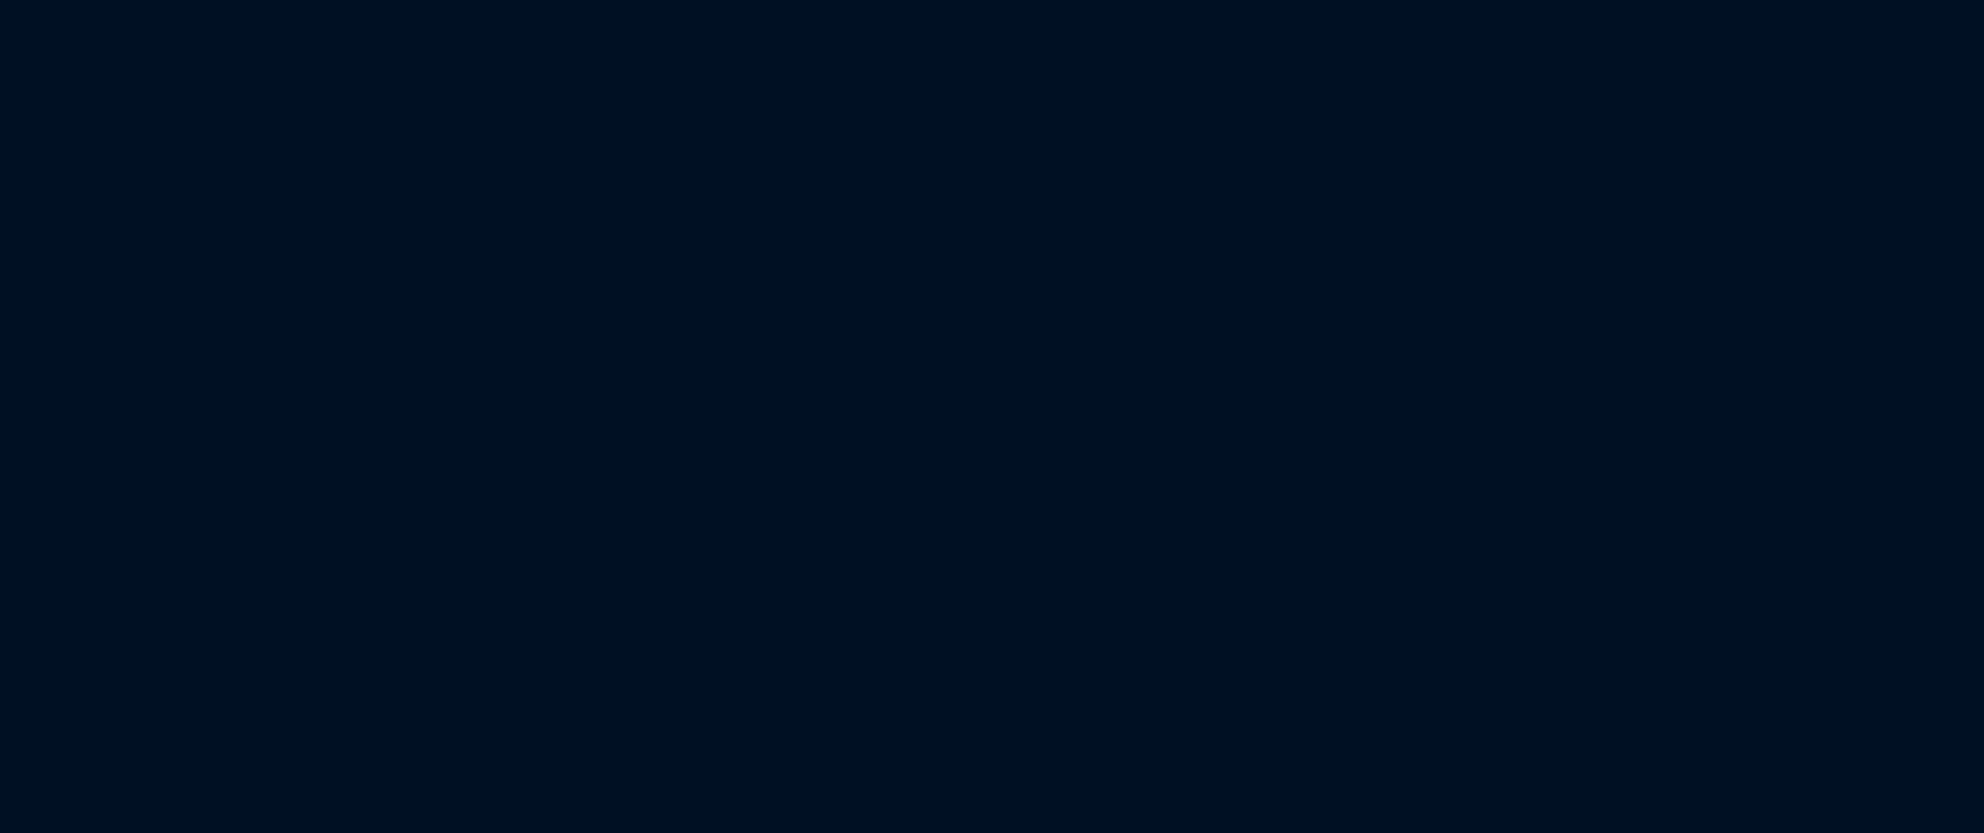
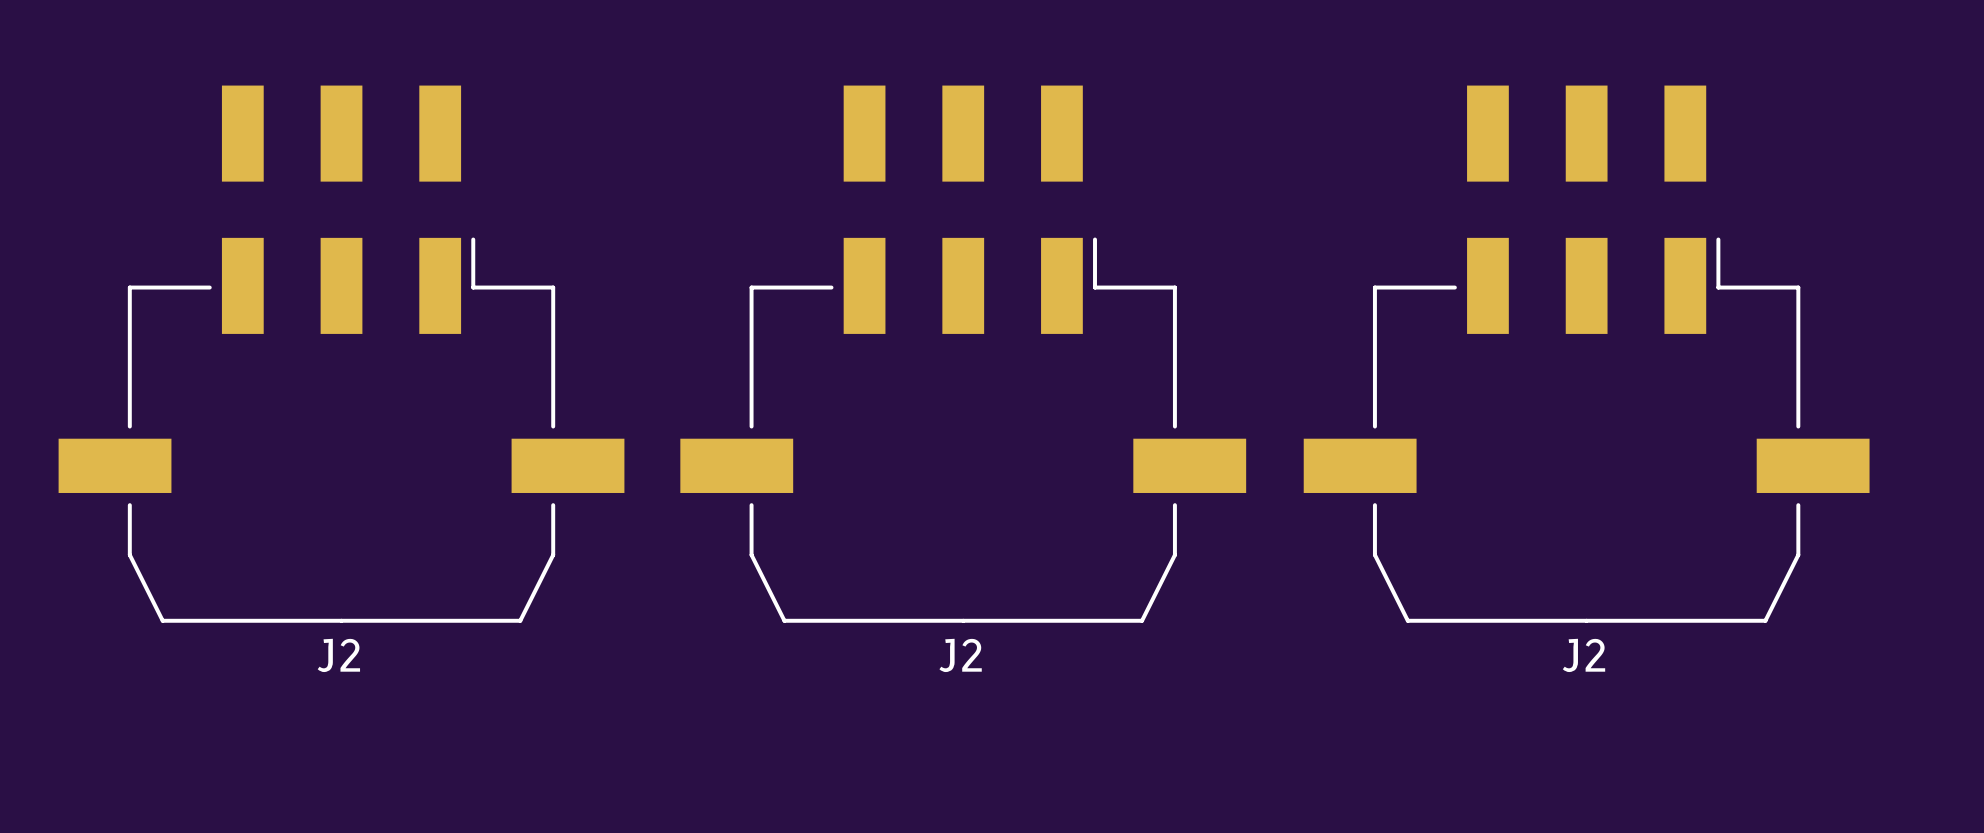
J2: none -> (341, 354)
J2: none -> (963, 354)
J2: none -> (1586, 354)

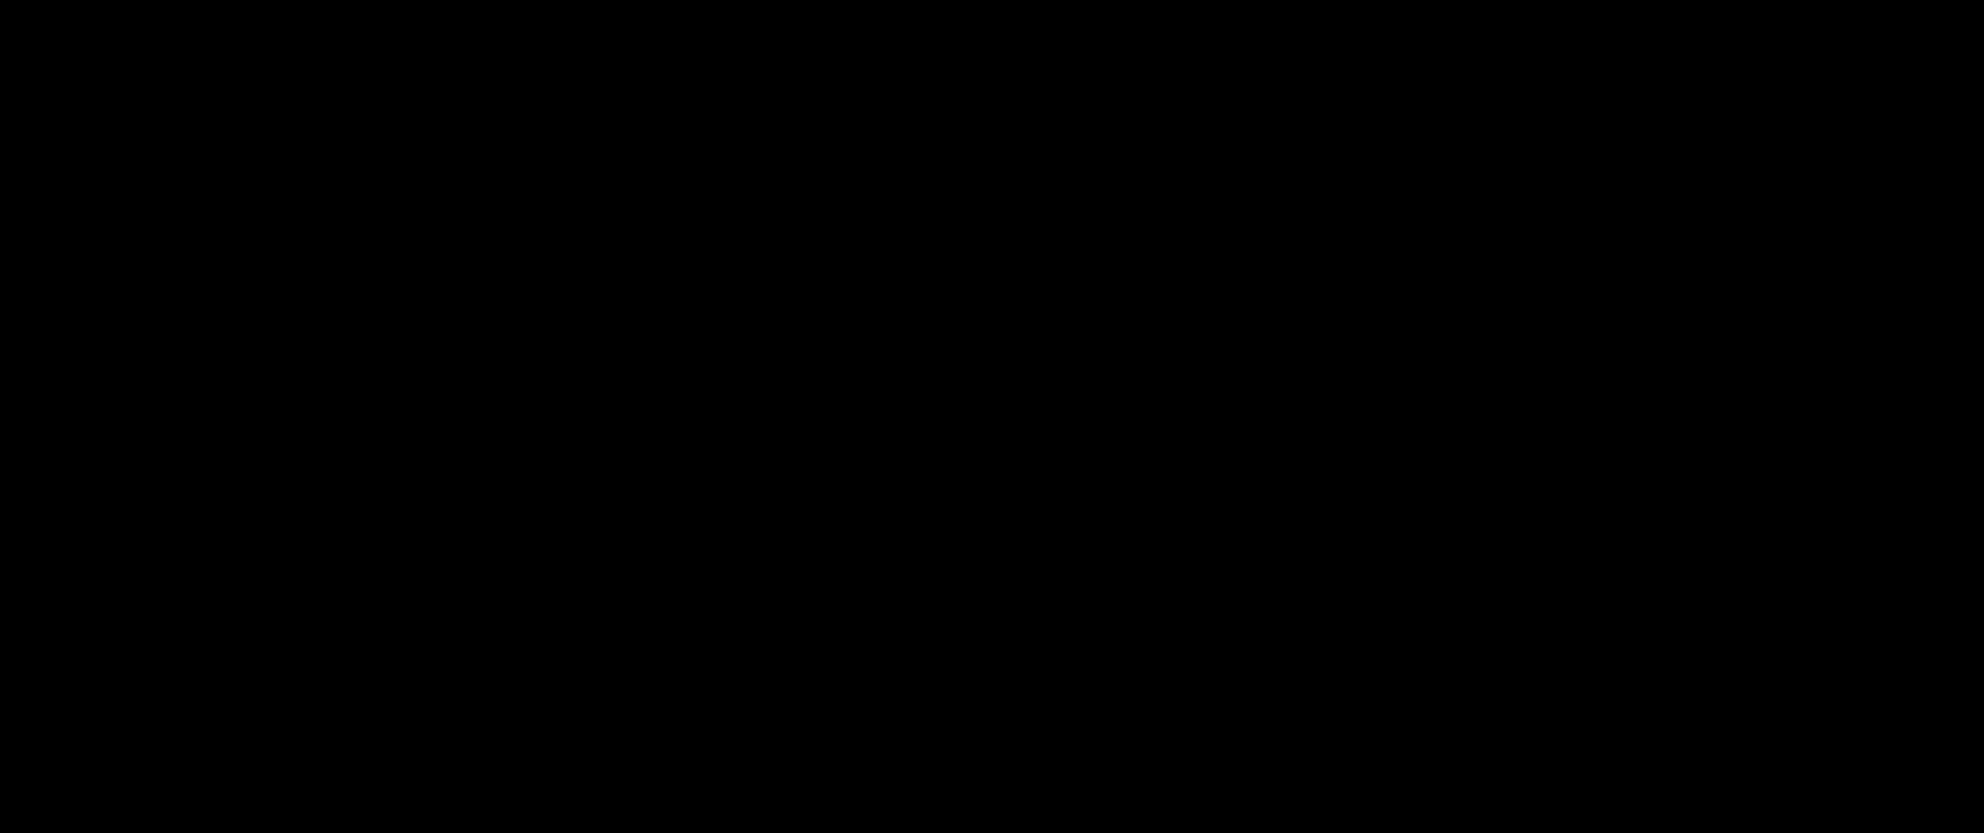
J2: (341, 354) -> none
J2: (963, 354) -> none
J2: (1586, 354) -> none

